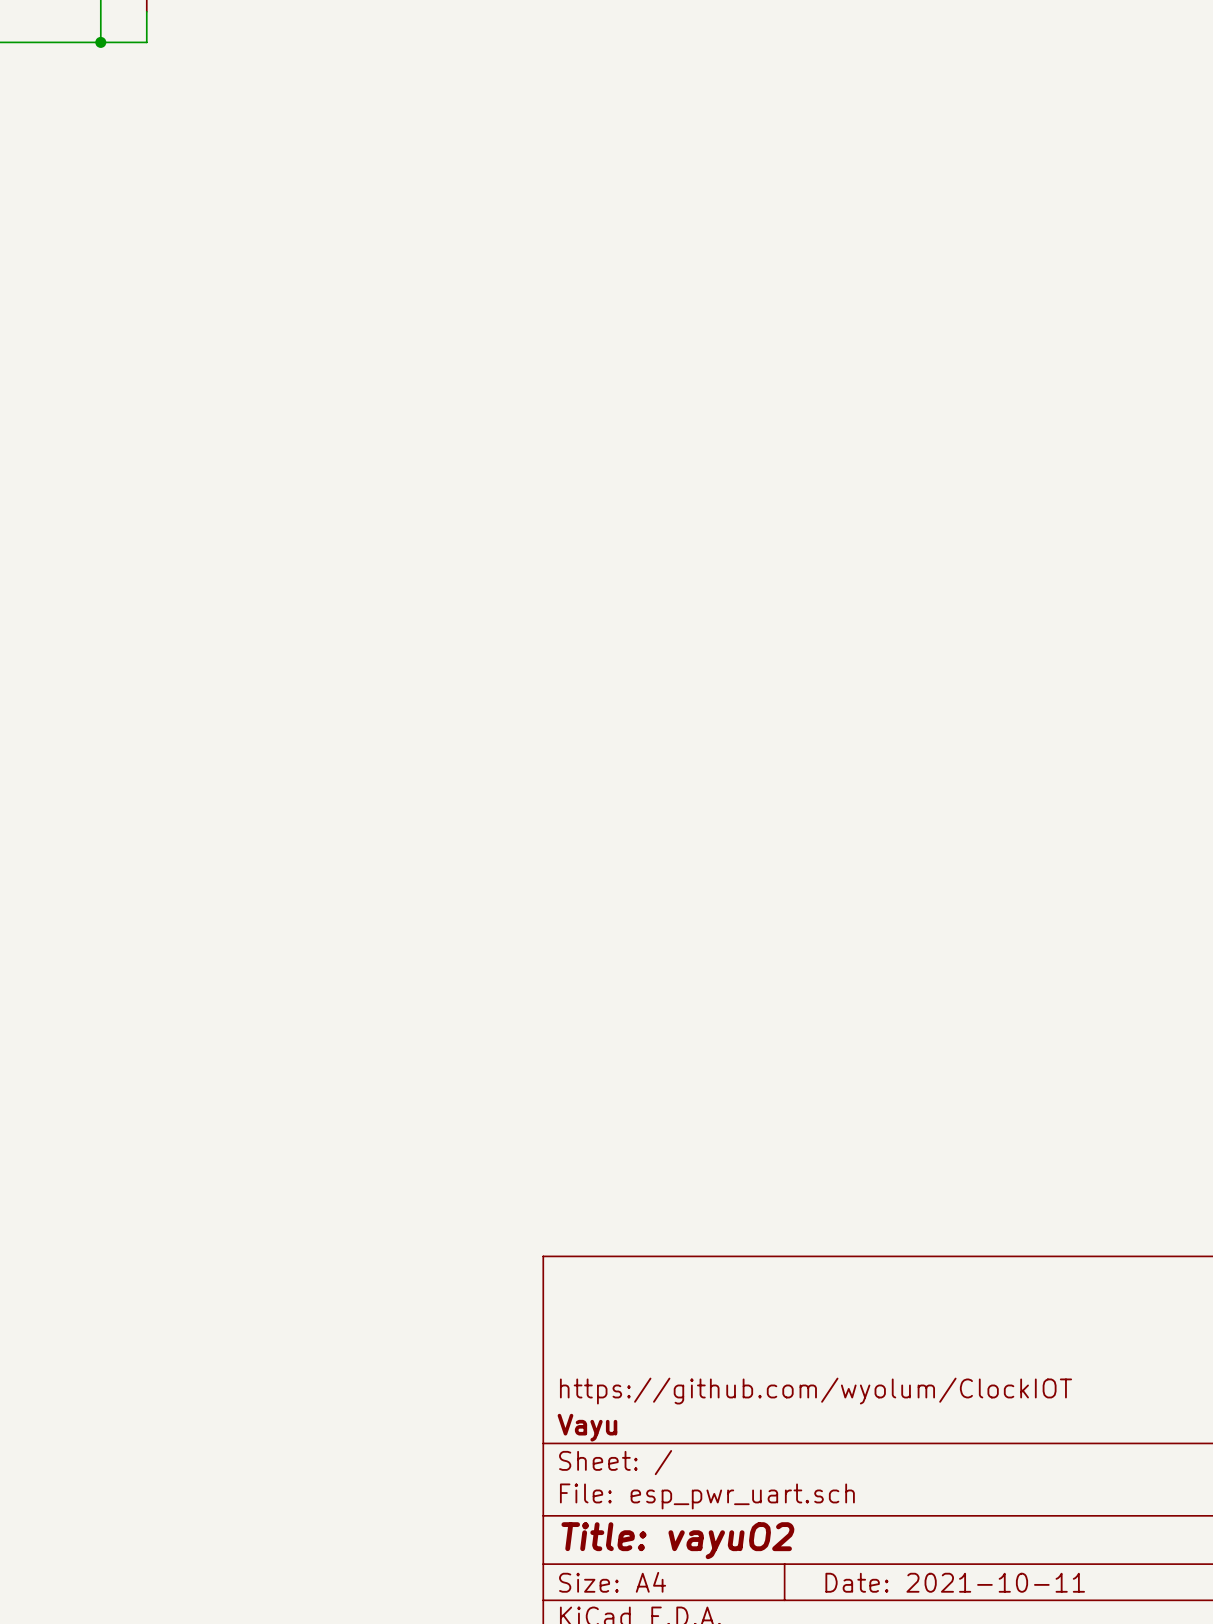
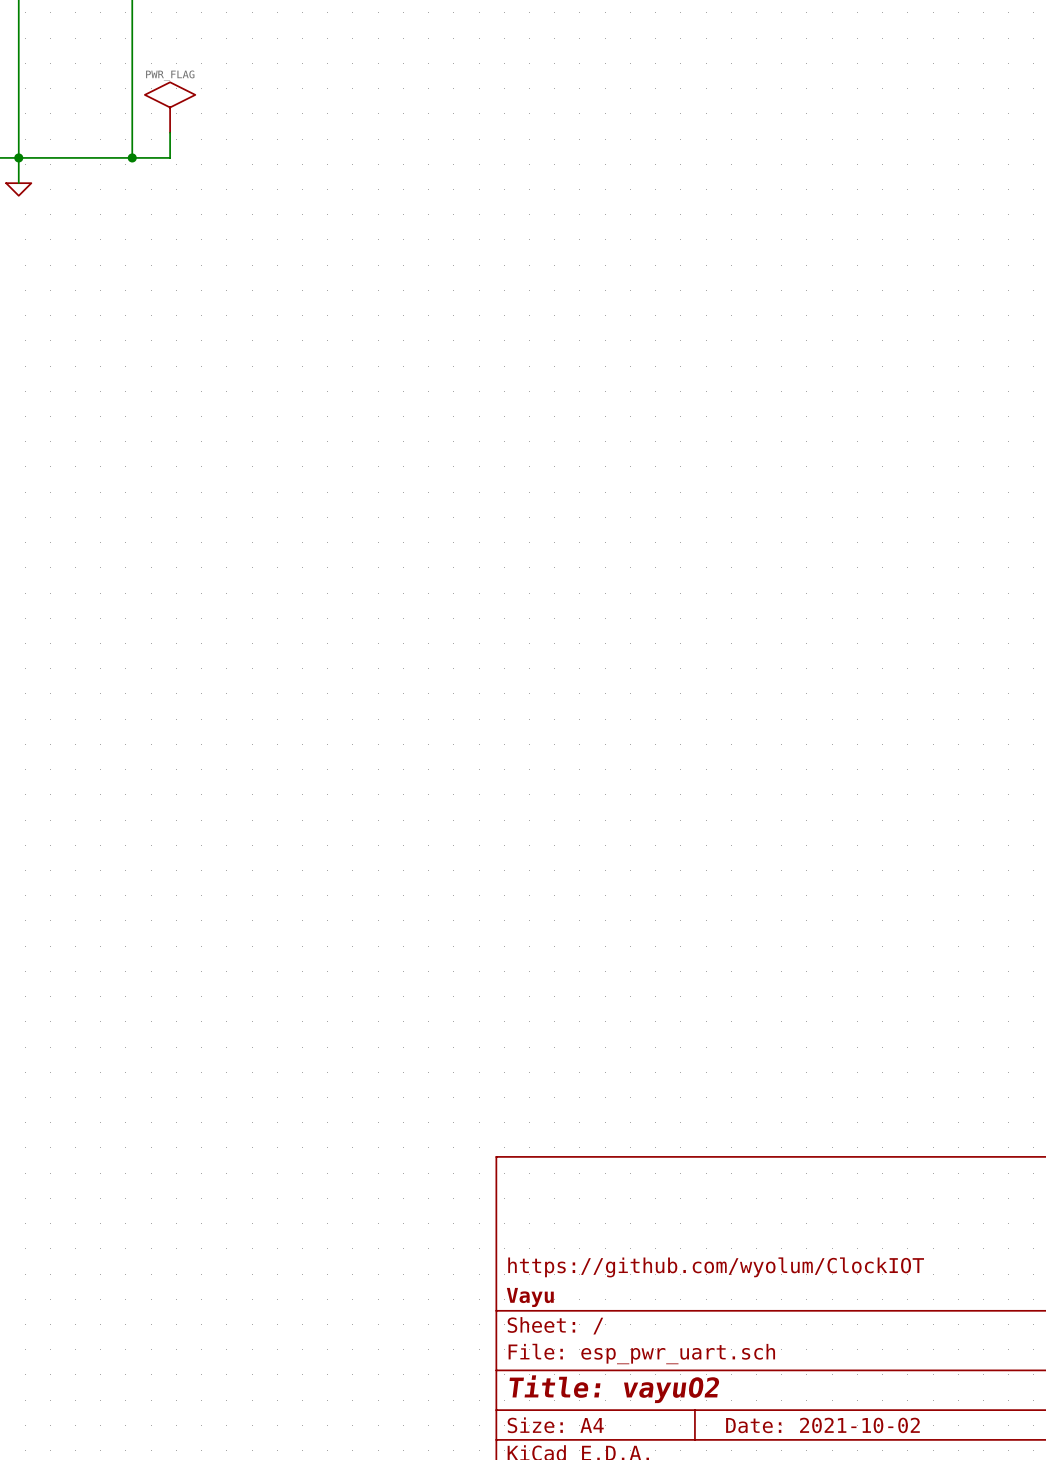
title block: Date: 2021-10-11 (955, 1582) -> Date: 2021-10-02 (822, 1425)

